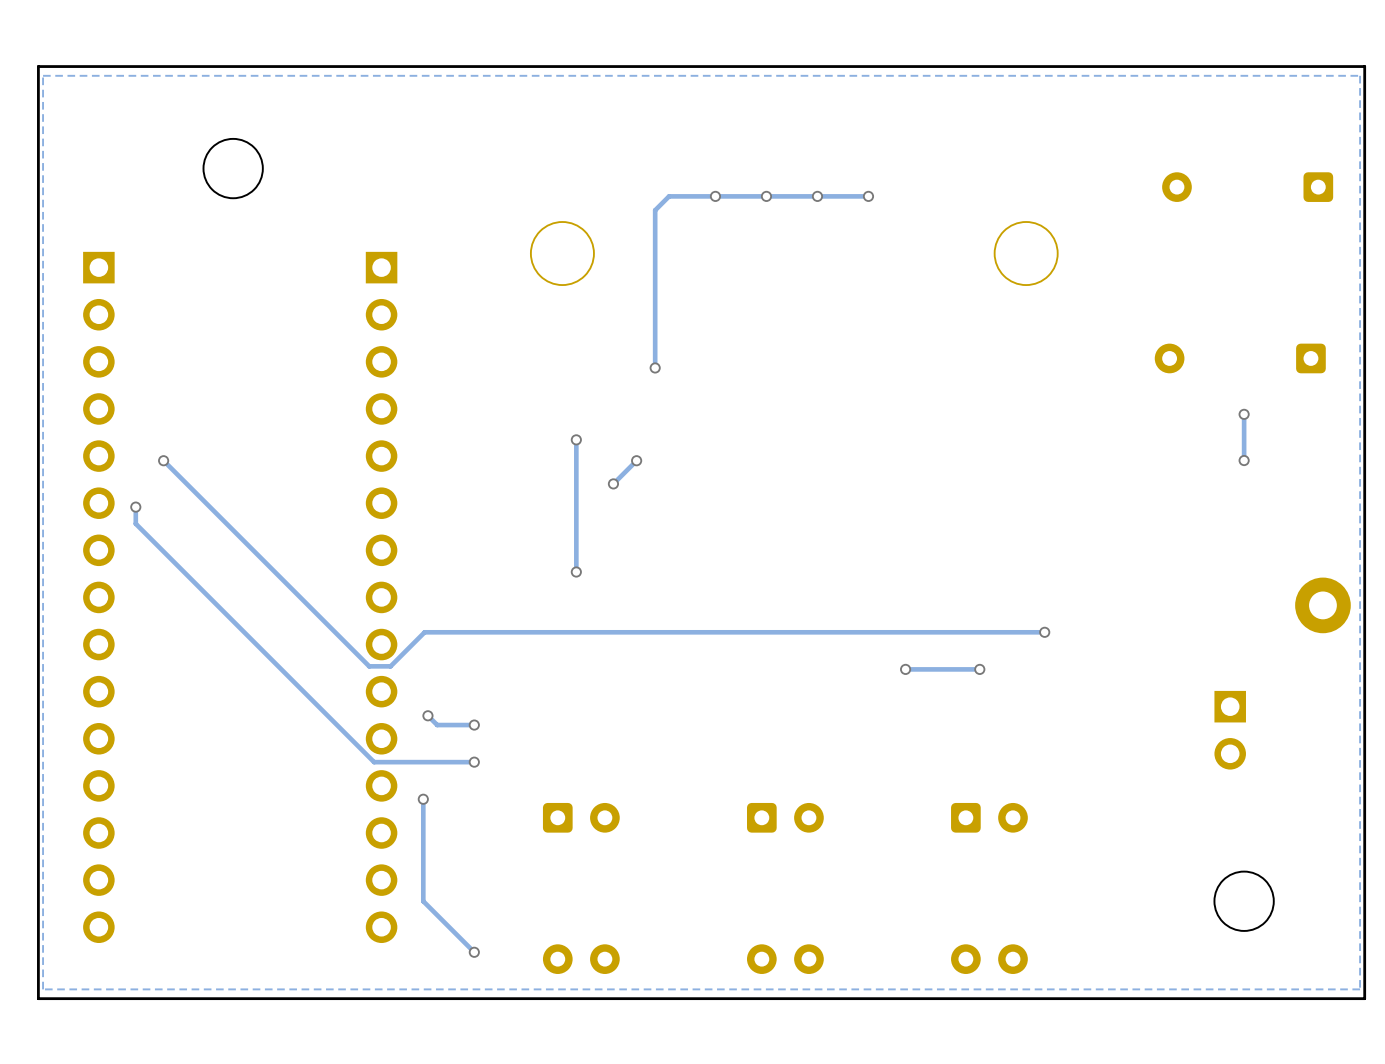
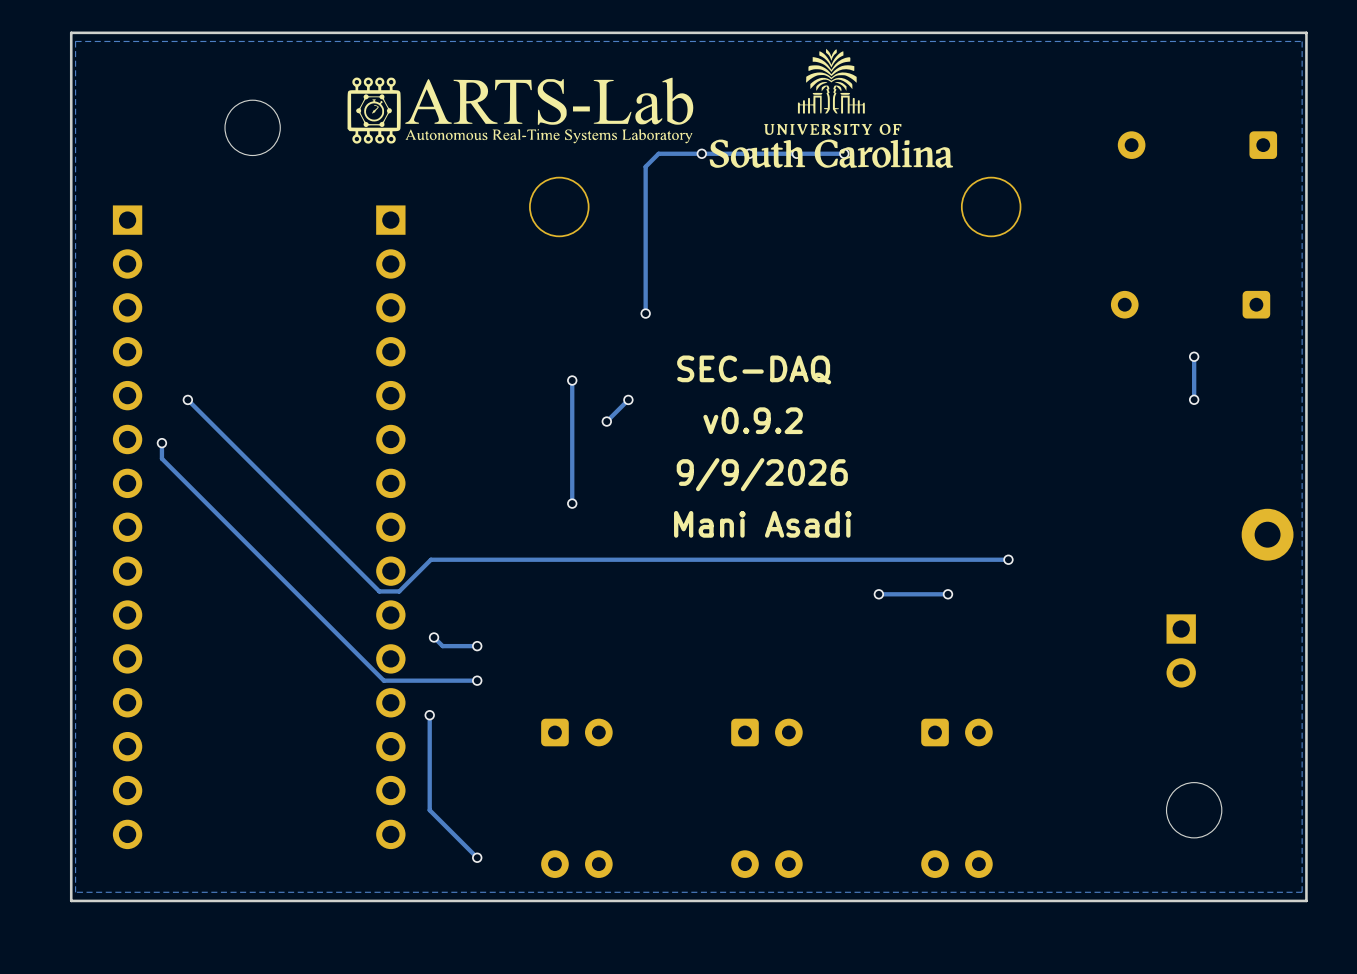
drawing: none -> [347, 48, 954, 168]
text: none -> SEC-DAQ (754, 369)
text: none -> v0.9.2 (753, 420)
text: none -> 9/9/2026 (762, 474)
text: none -> Mani Asadi (762, 524)

